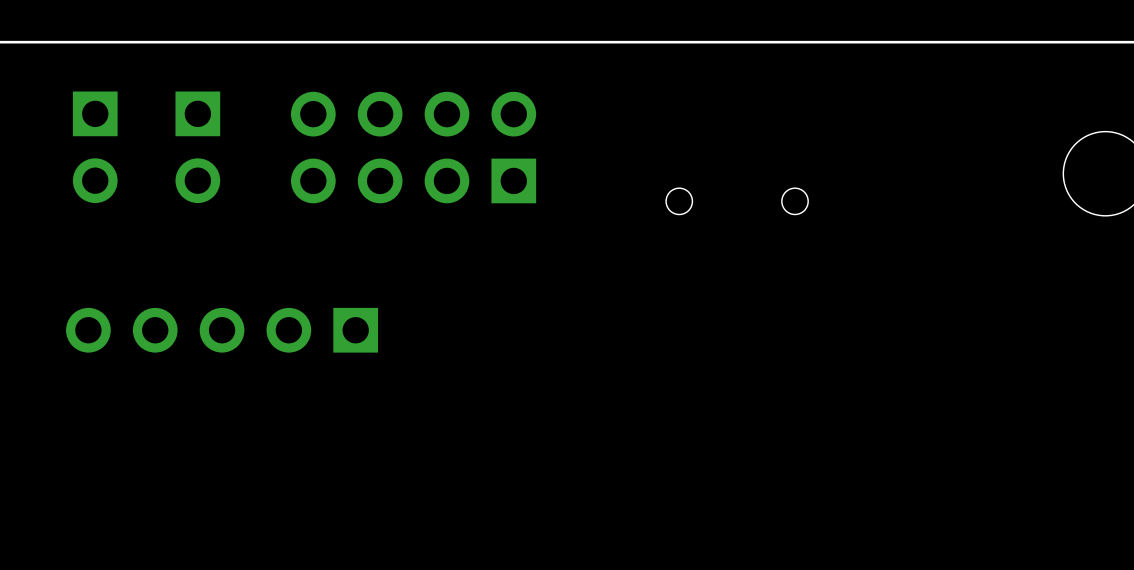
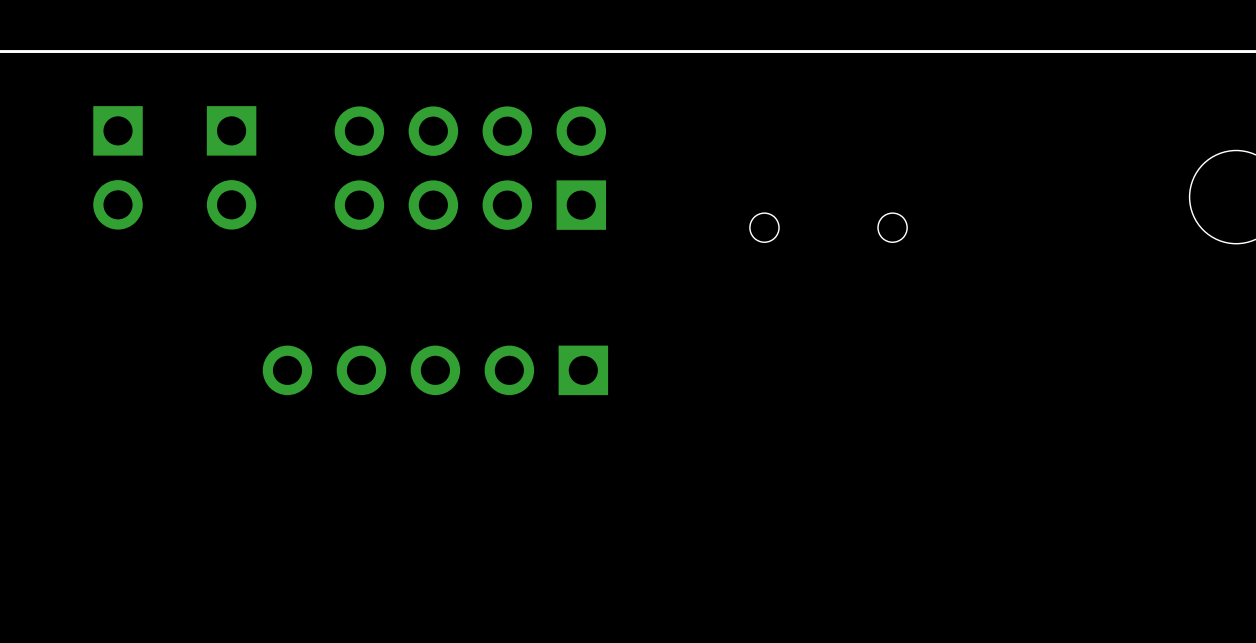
part position: (222, 330) -> (435, 370)

